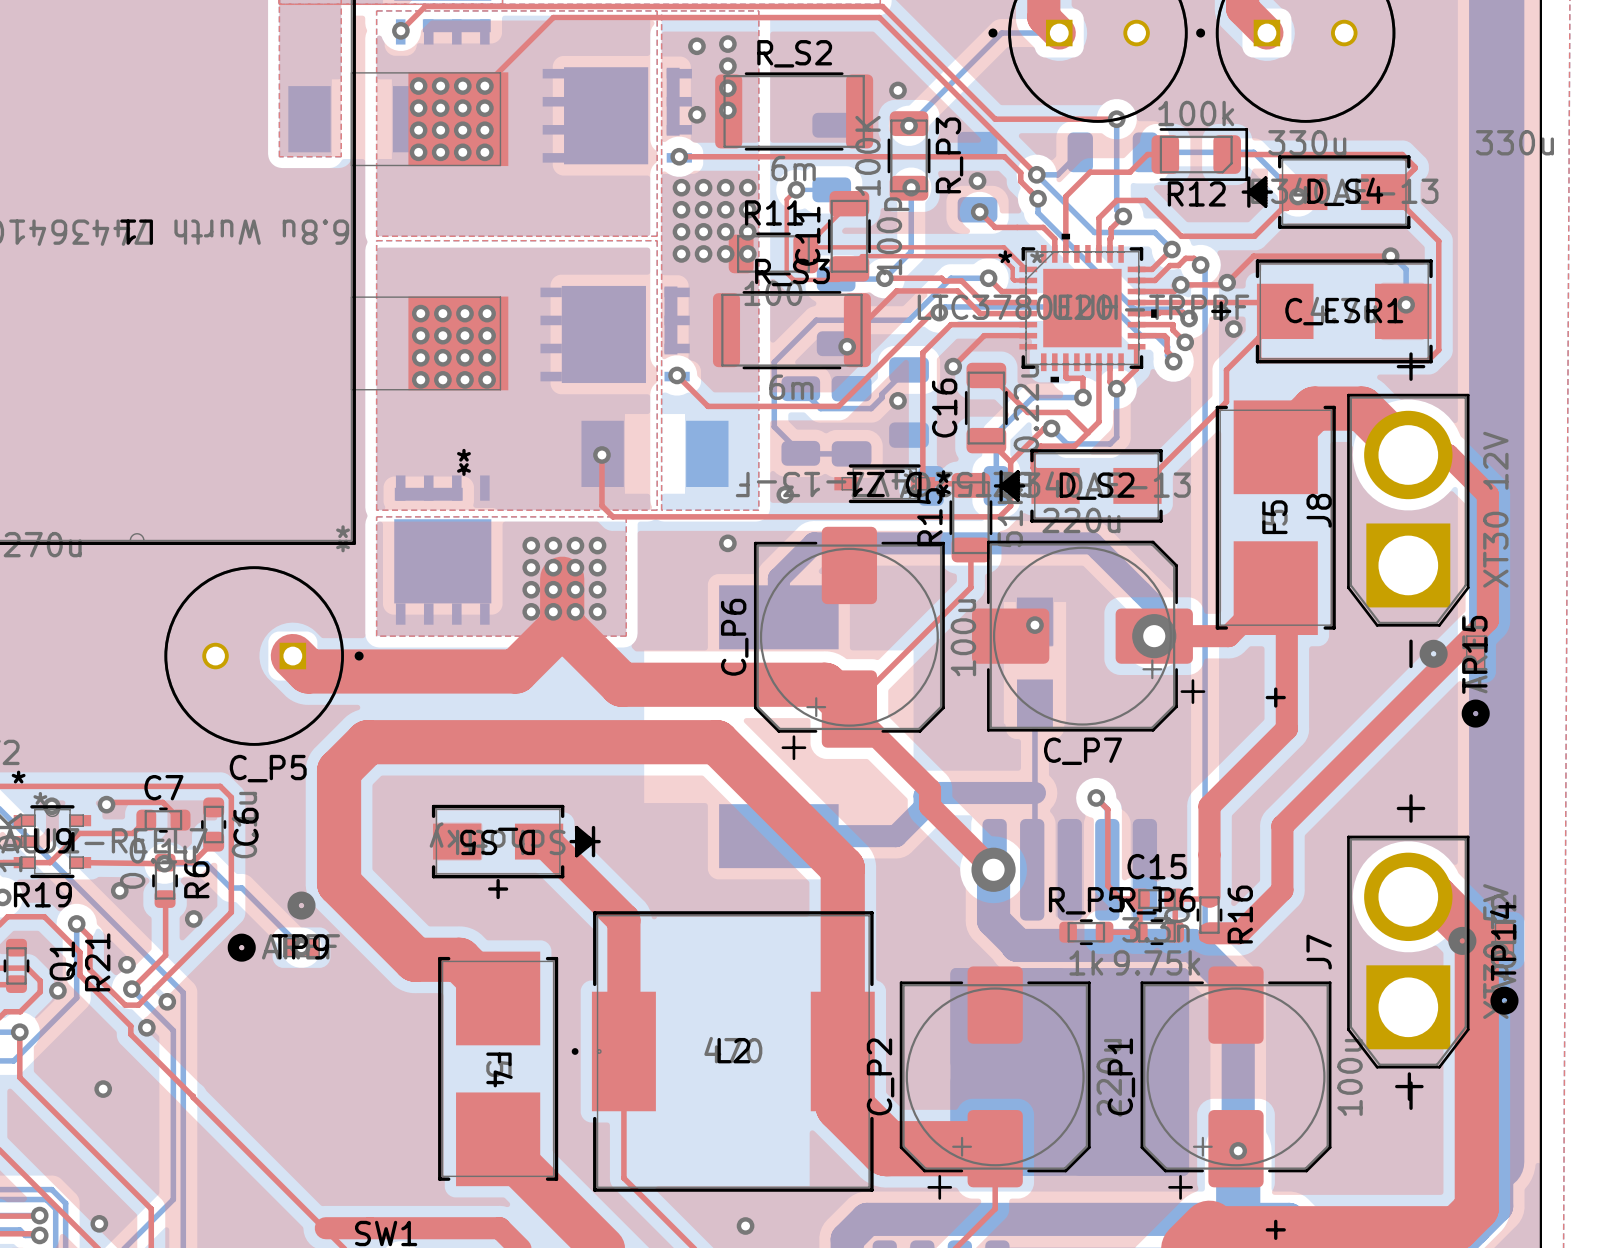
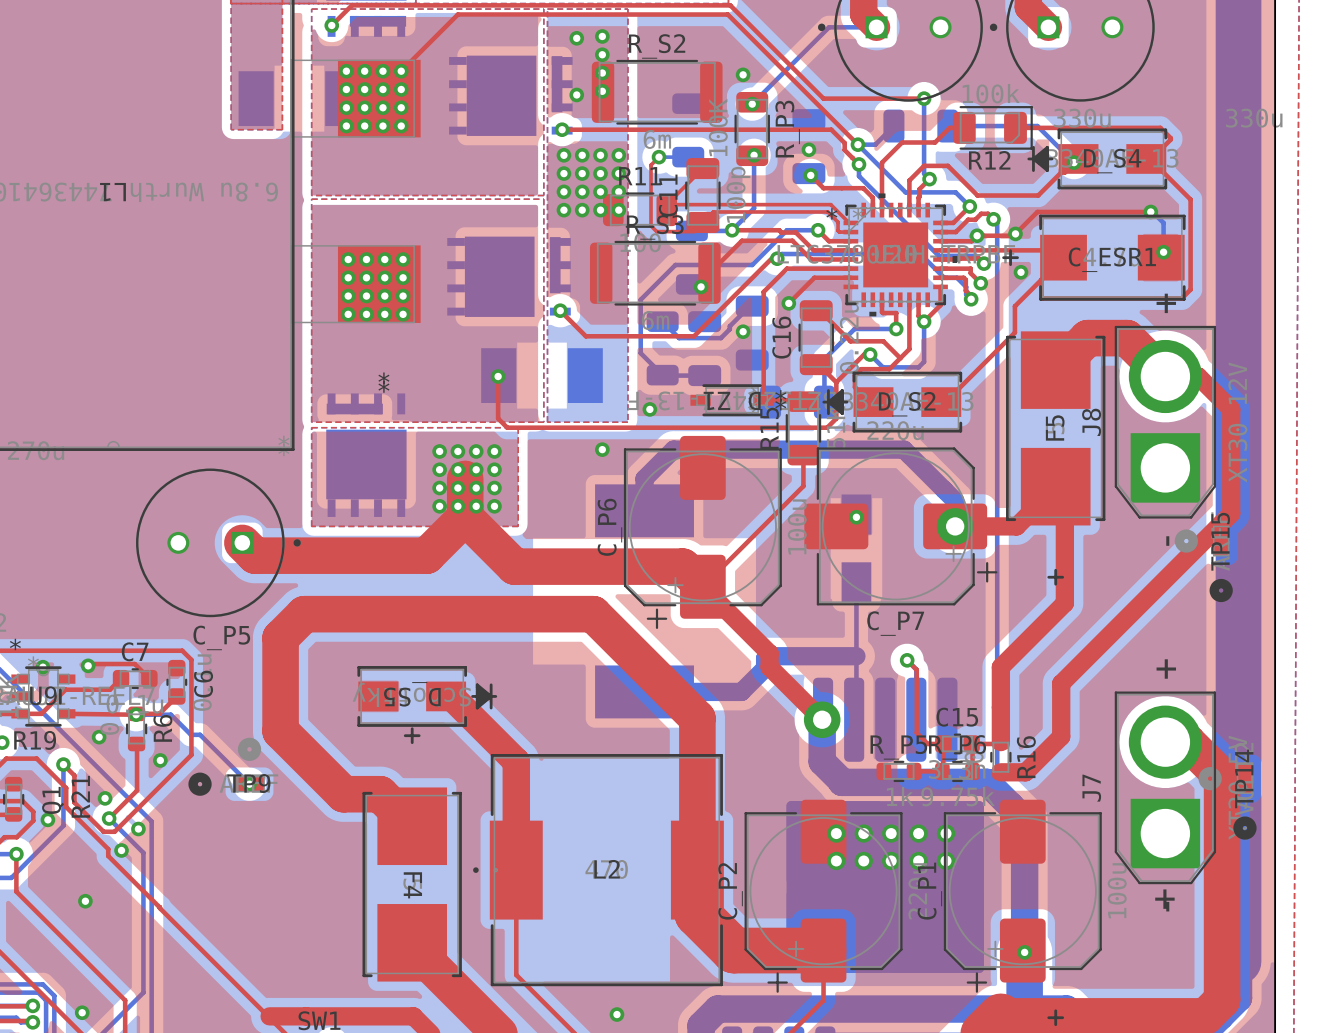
via: none -> (836, 833)
via: none -> (863, 833)
via: none -> (891, 833)
via: none -> (918, 833)
via: none -> (946, 833)
via: none -> (836, 860)
via: none -> (863, 860)
via: none -> (891, 860)
via: none -> (918, 860)
via: none -> (946, 860)

